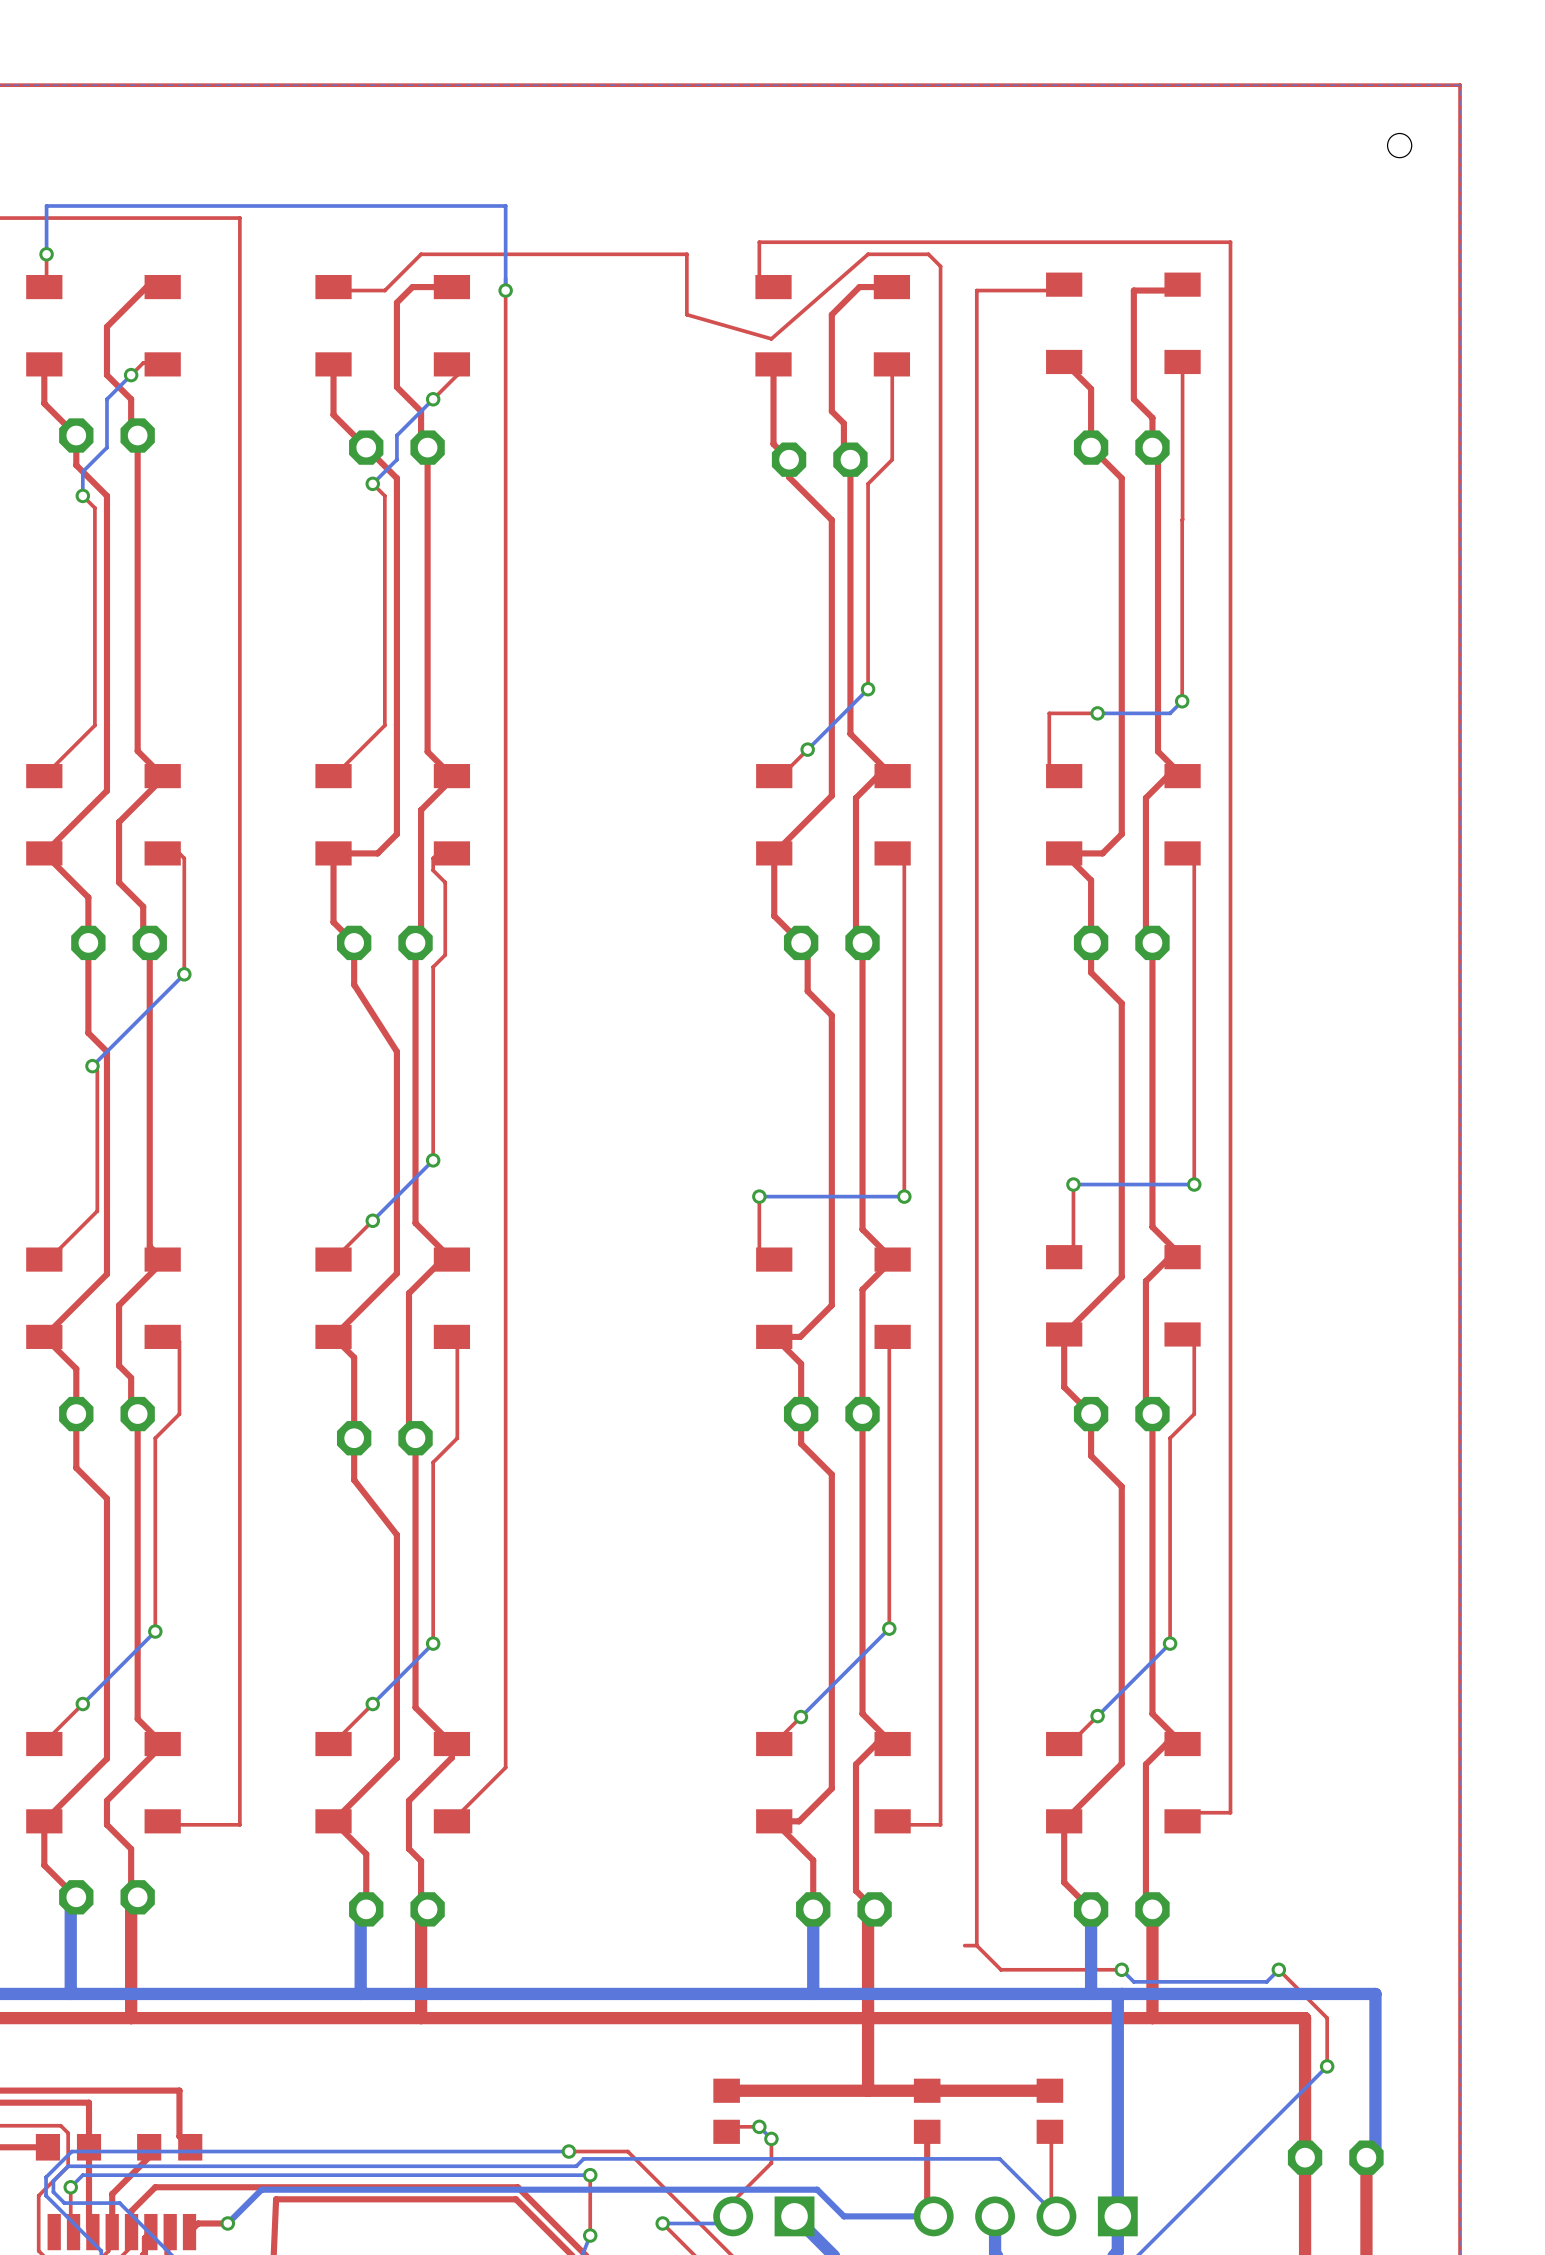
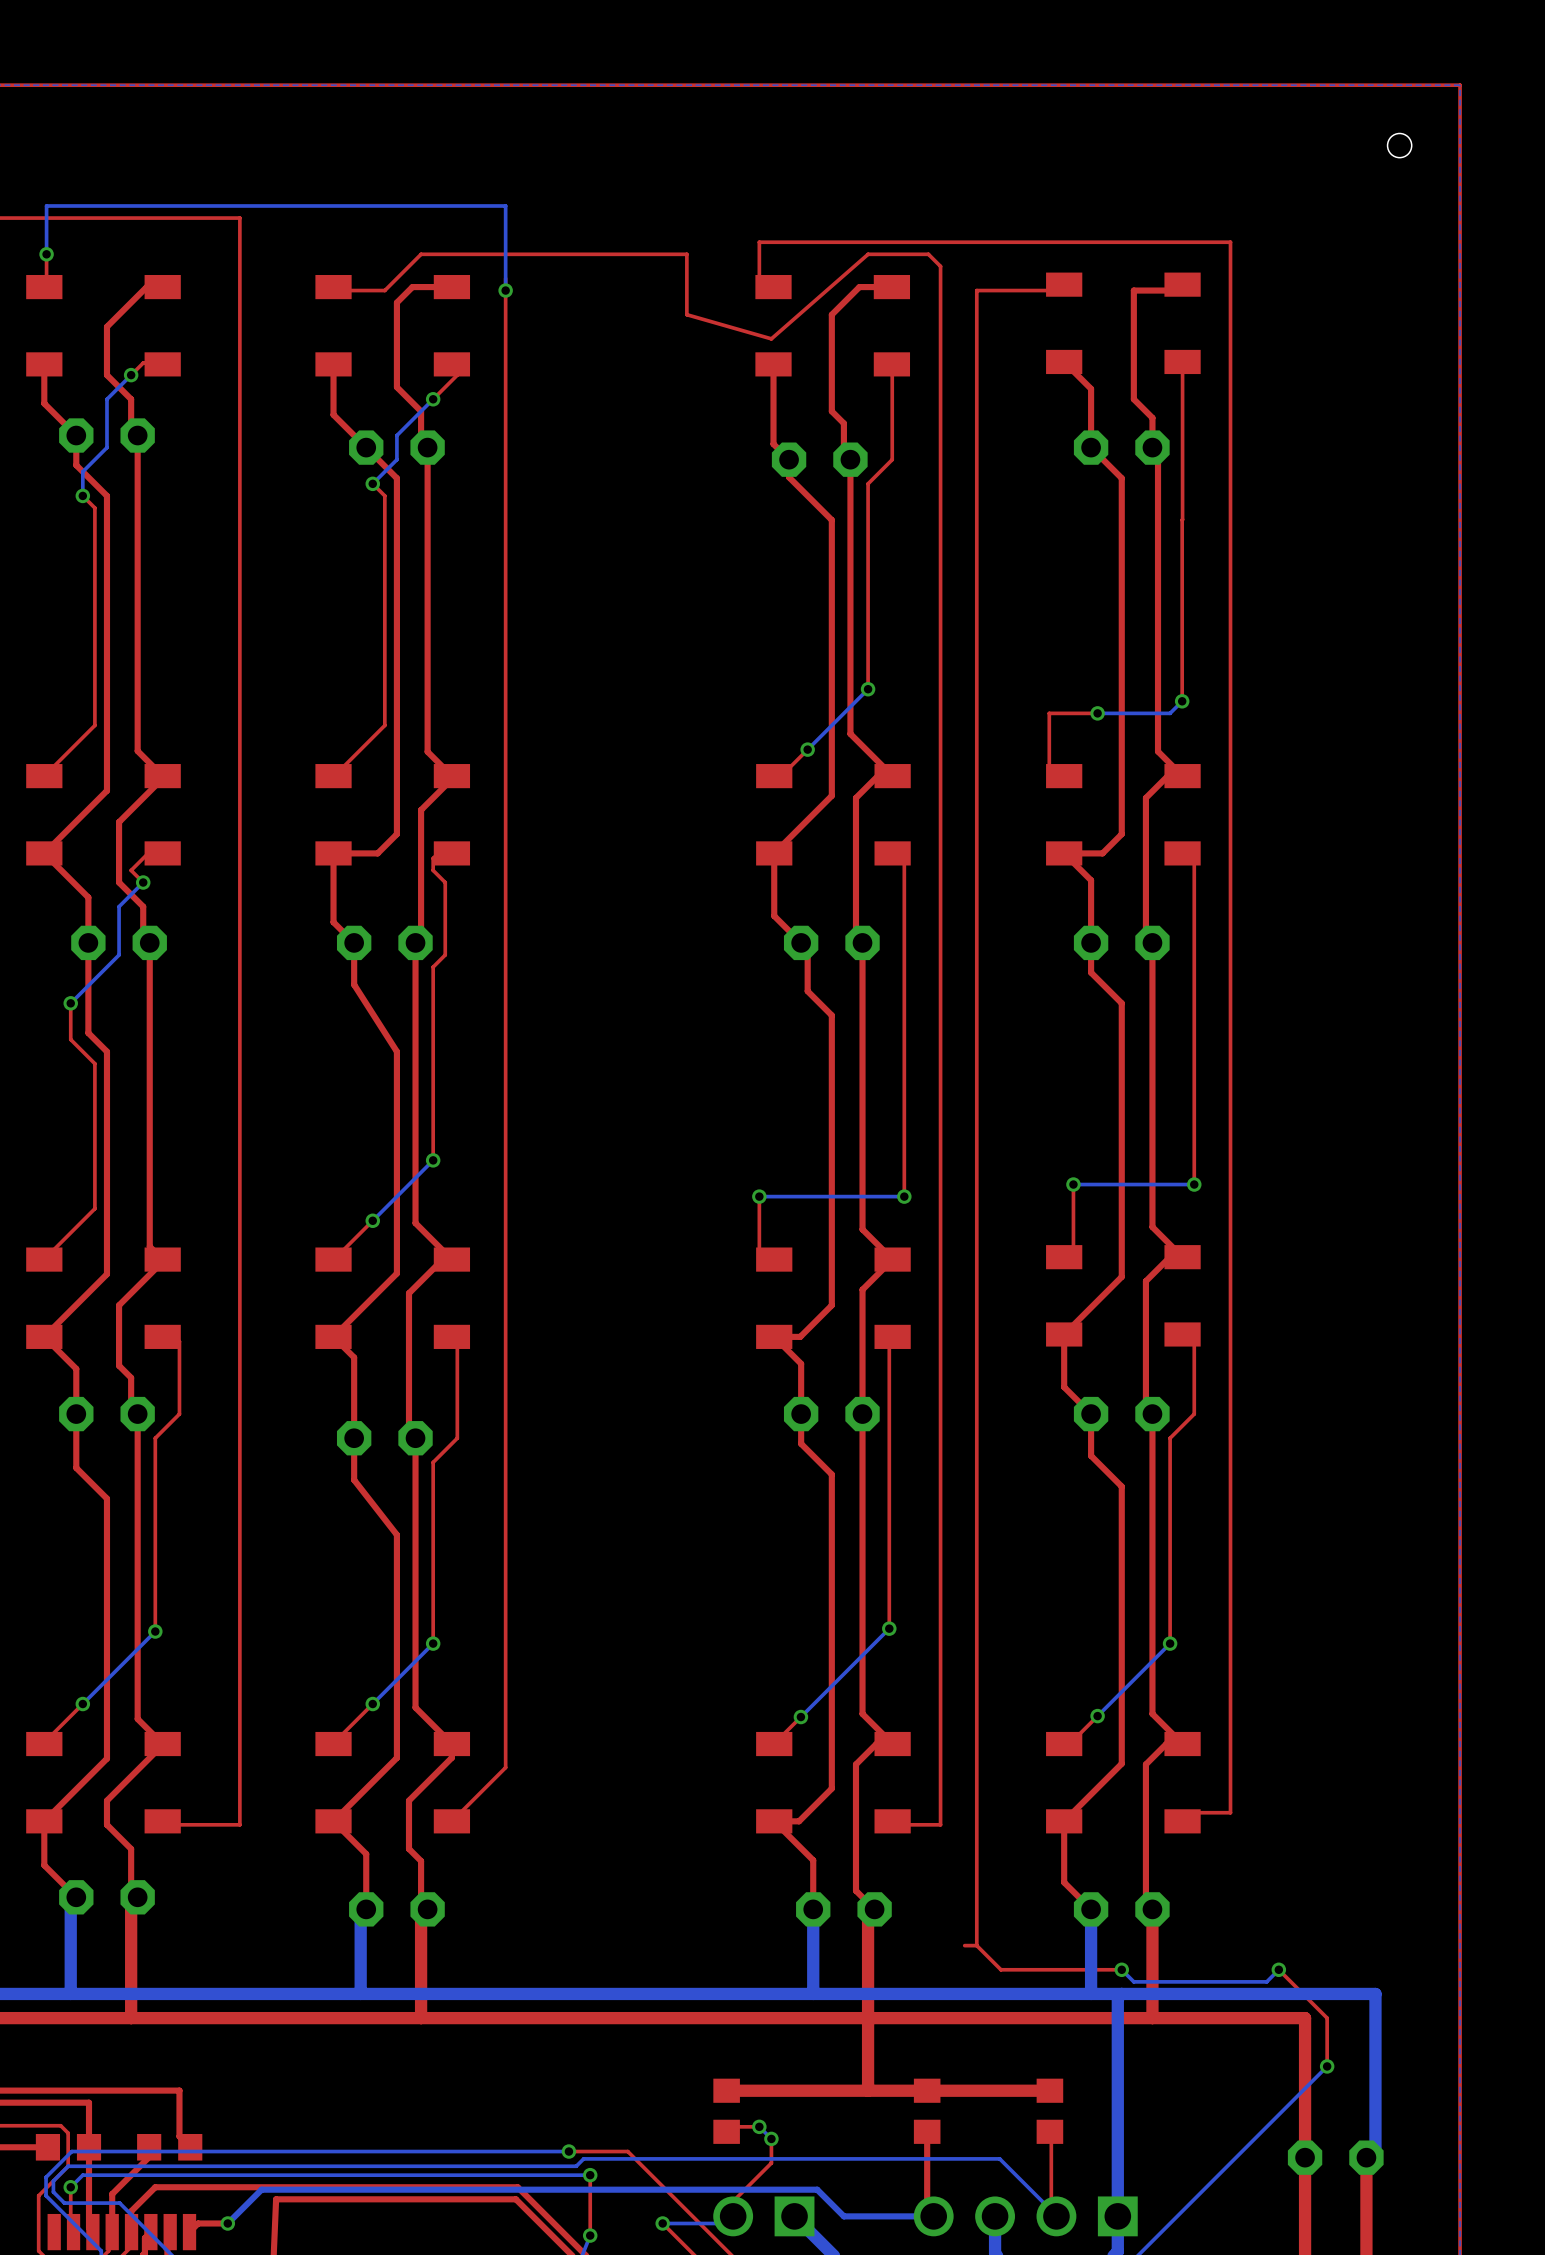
top track: (162, 853) (179, 853) (184, 858) (184, 974) -> (162, 853) (155, 846) (131, 870) (143, 882)
bottom track: none -> (143, 882) (119, 906) (119, 954) (70, 1003)
via: none -> (143, 882)
bottom track: (184, 974) (92, 1066) -> none
via: (184, 974) -> none
via: none -> (70, 1003)
top track: (92, 1066) (97, 1070) (97, 1211) (48, 1259) (44, 1259) -> (70, 1003) (70, 1039) (94, 1063) (94, 1208) (44, 1259)
via: (92, 1066) -> none

